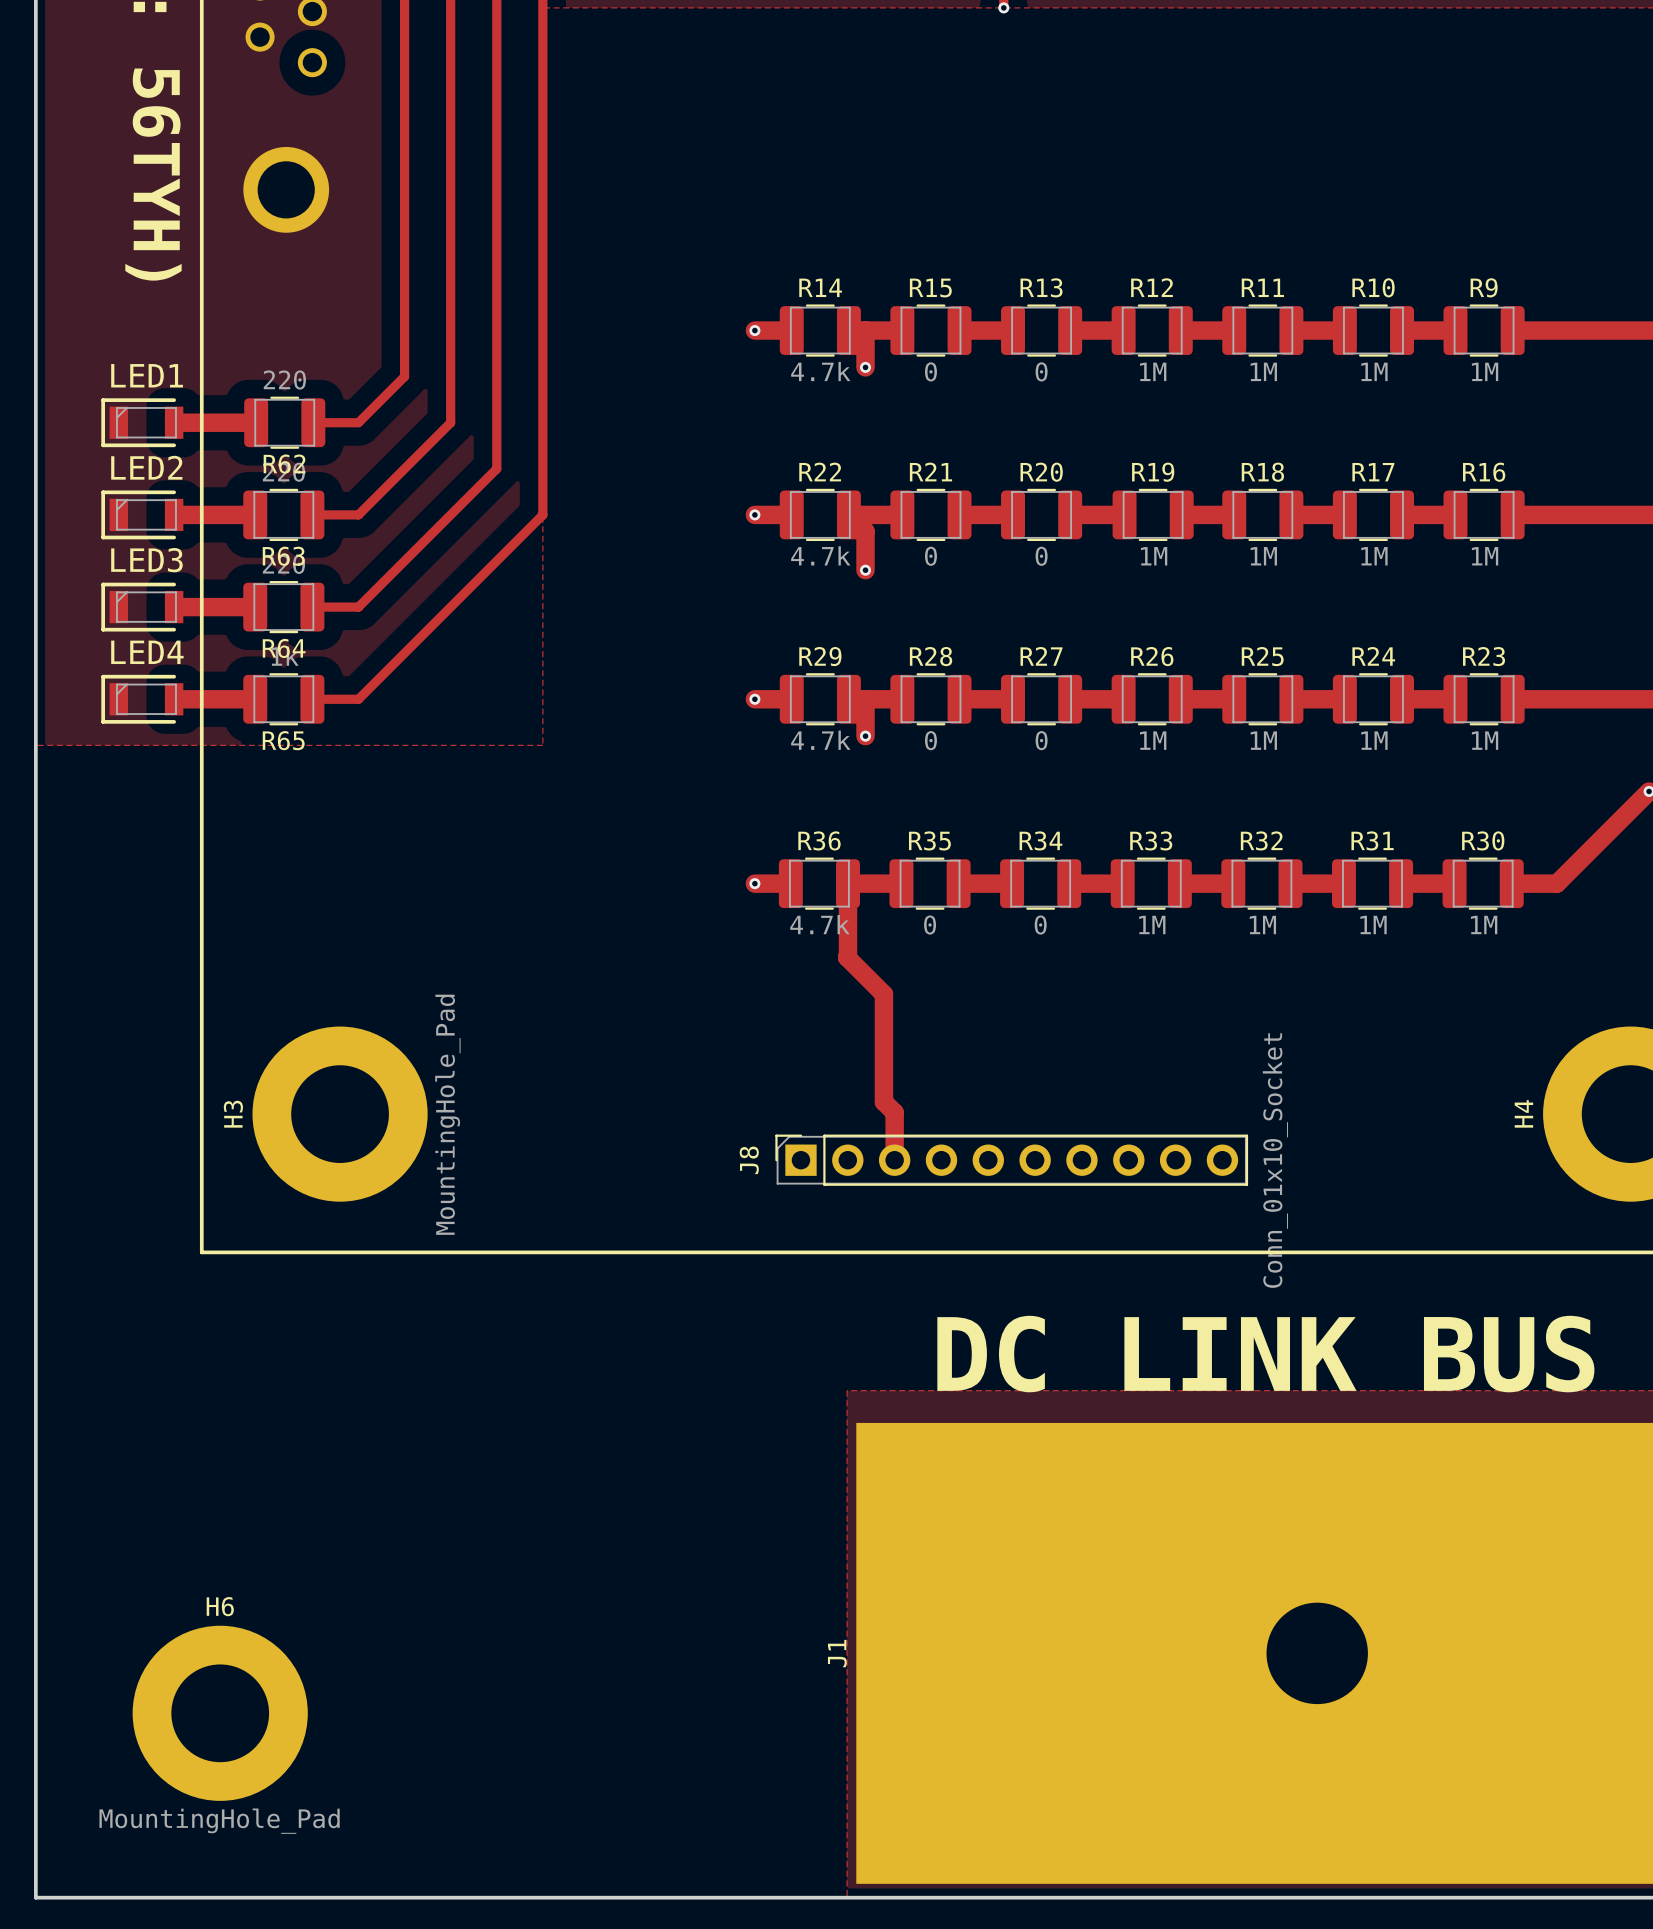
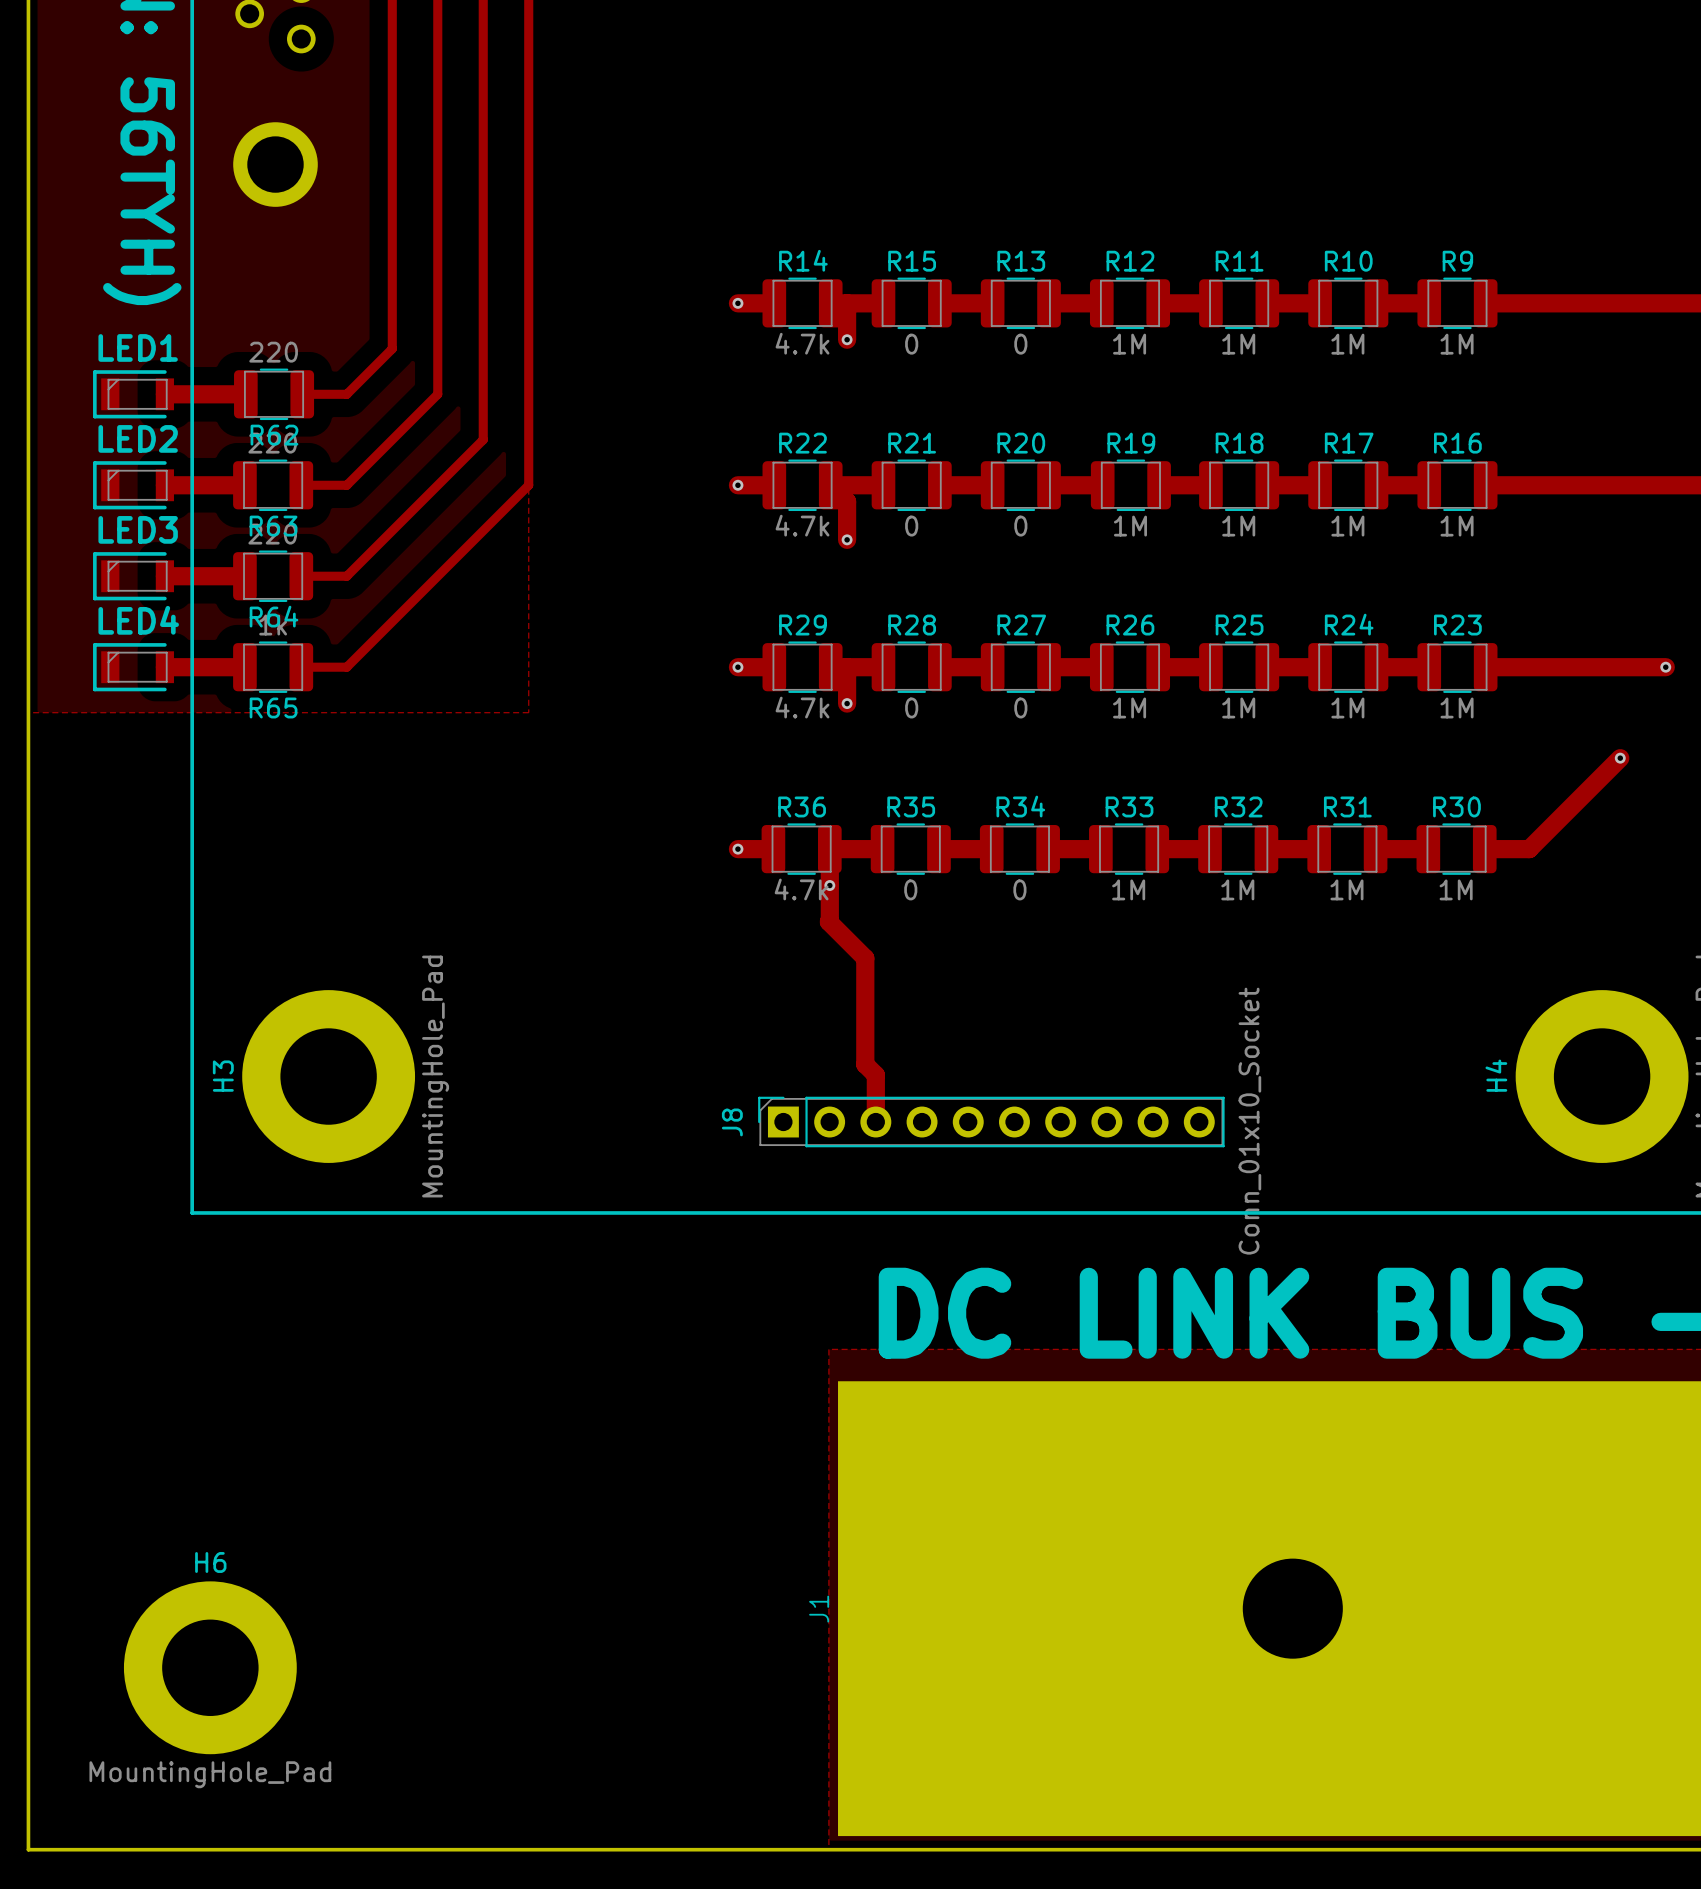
via: none -> (829, 885)

